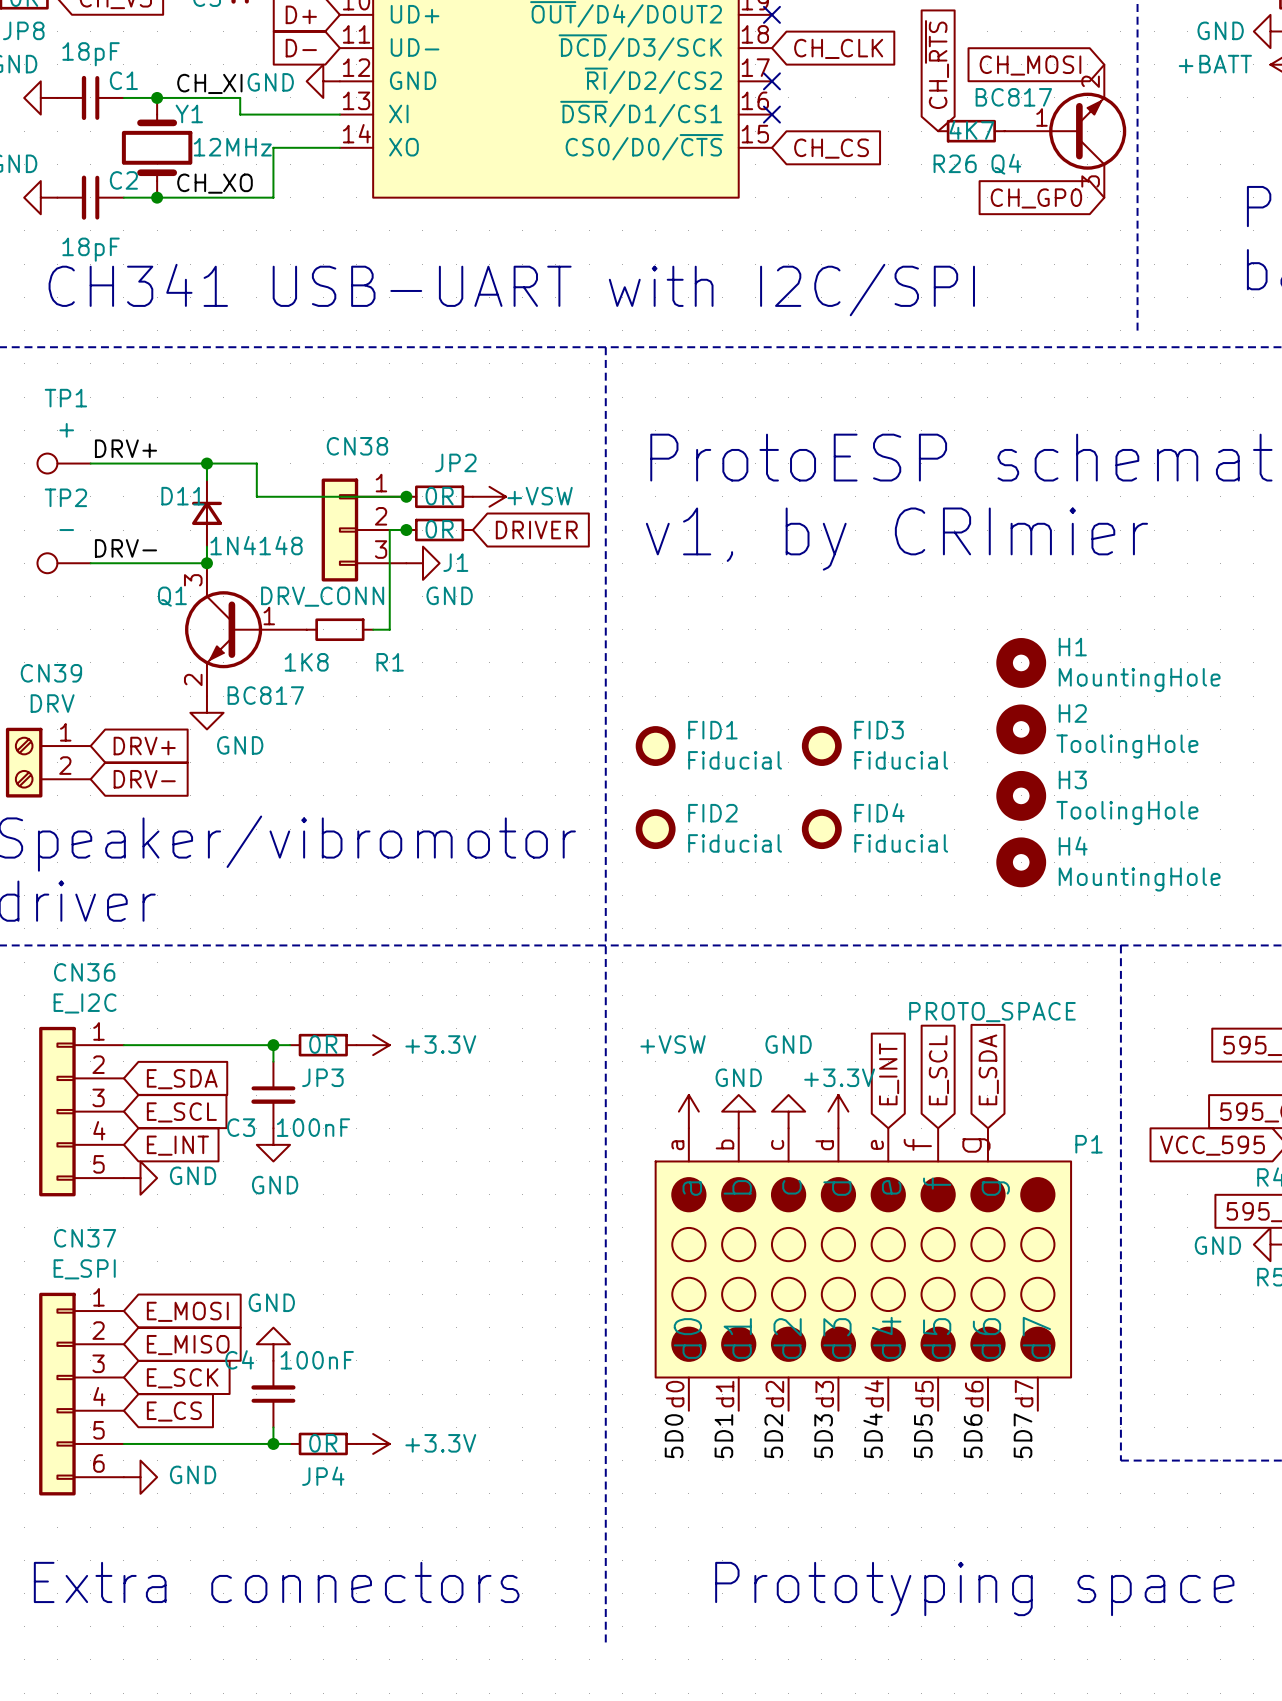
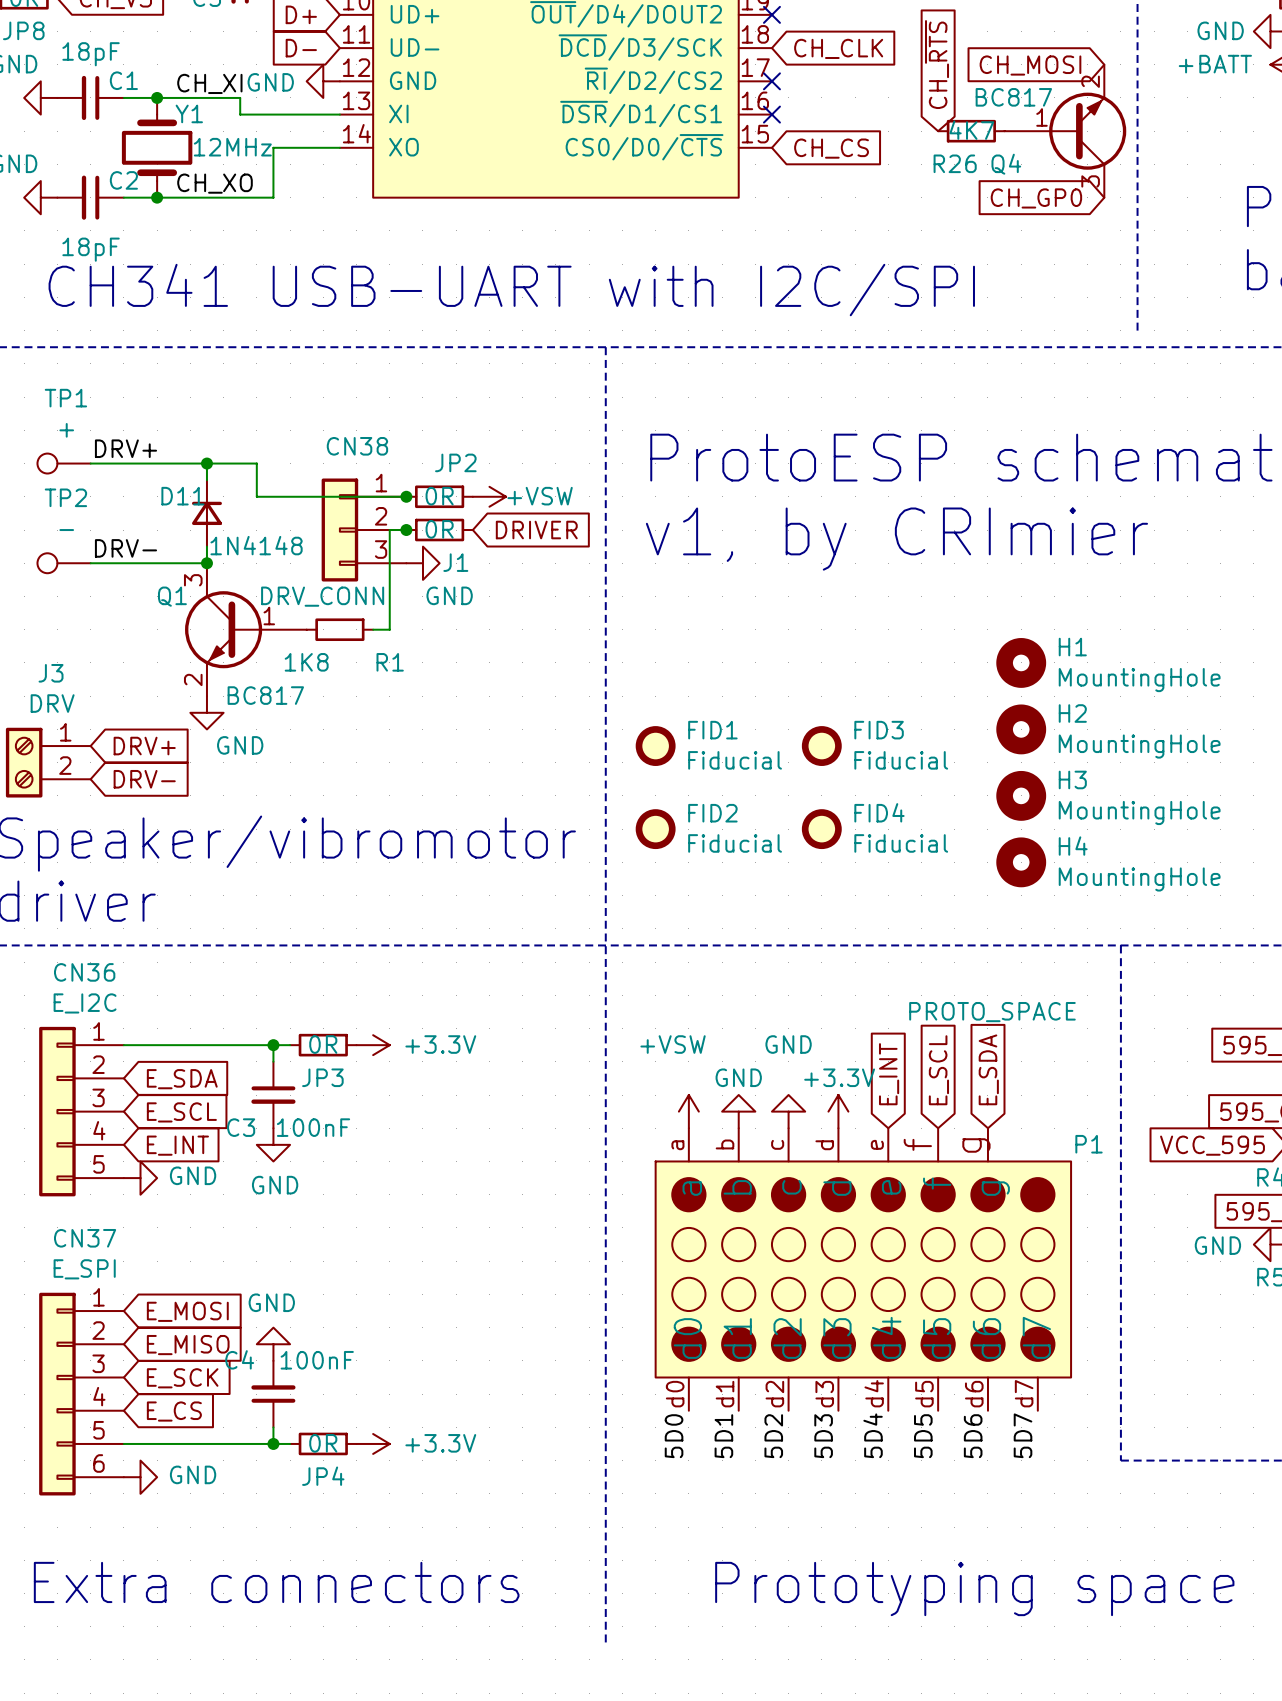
CN39 name: CN39 (51, 673) -> J3 (51, 673)
H2 value: ToolingHole (1127, 746) -> MountingHole (1139, 746)
H3 value: ToolingHole (1127, 812) -> MountingHole (1139, 812)

